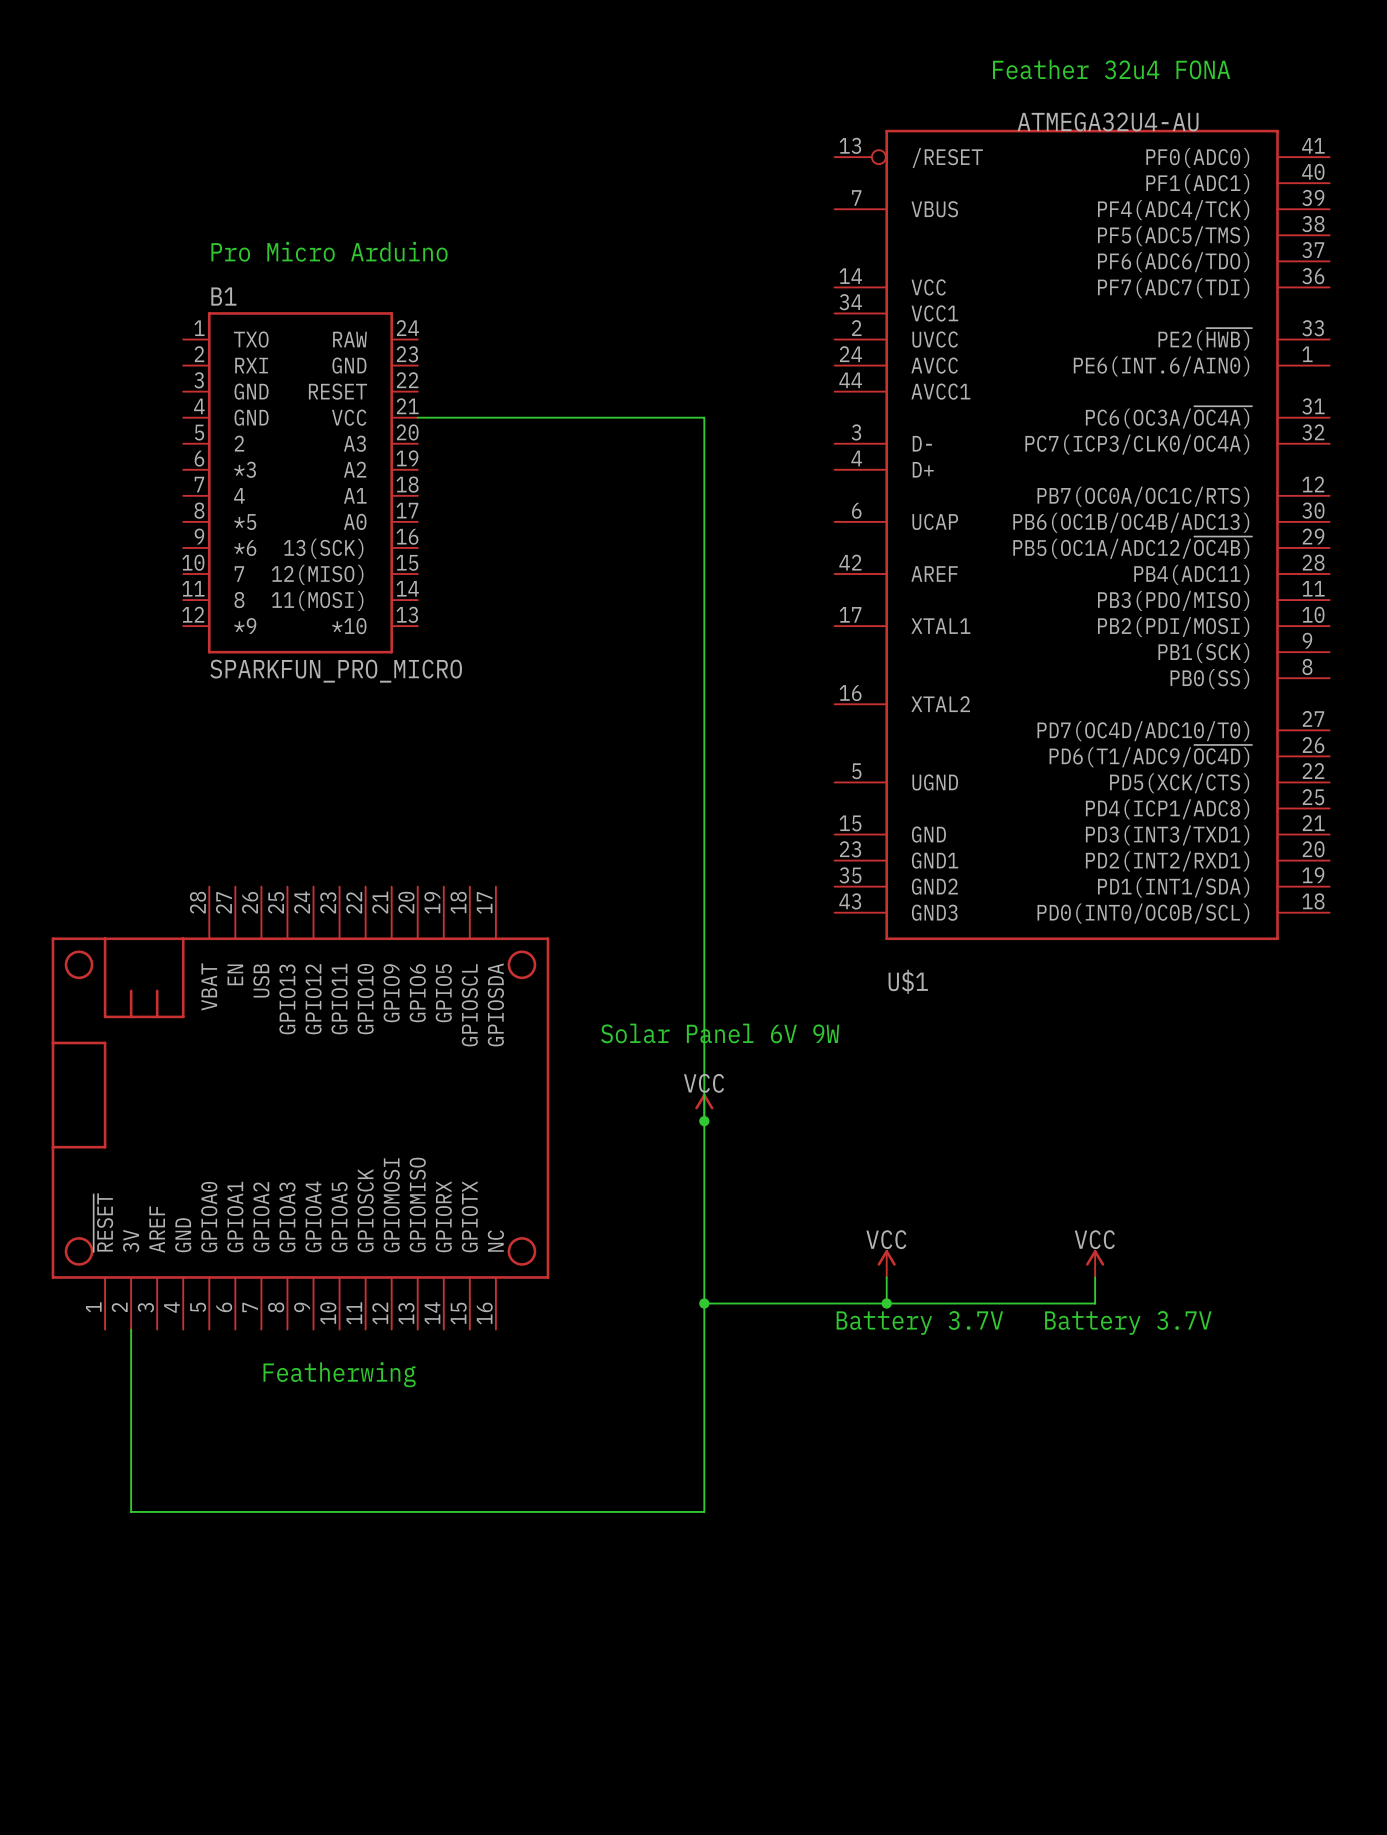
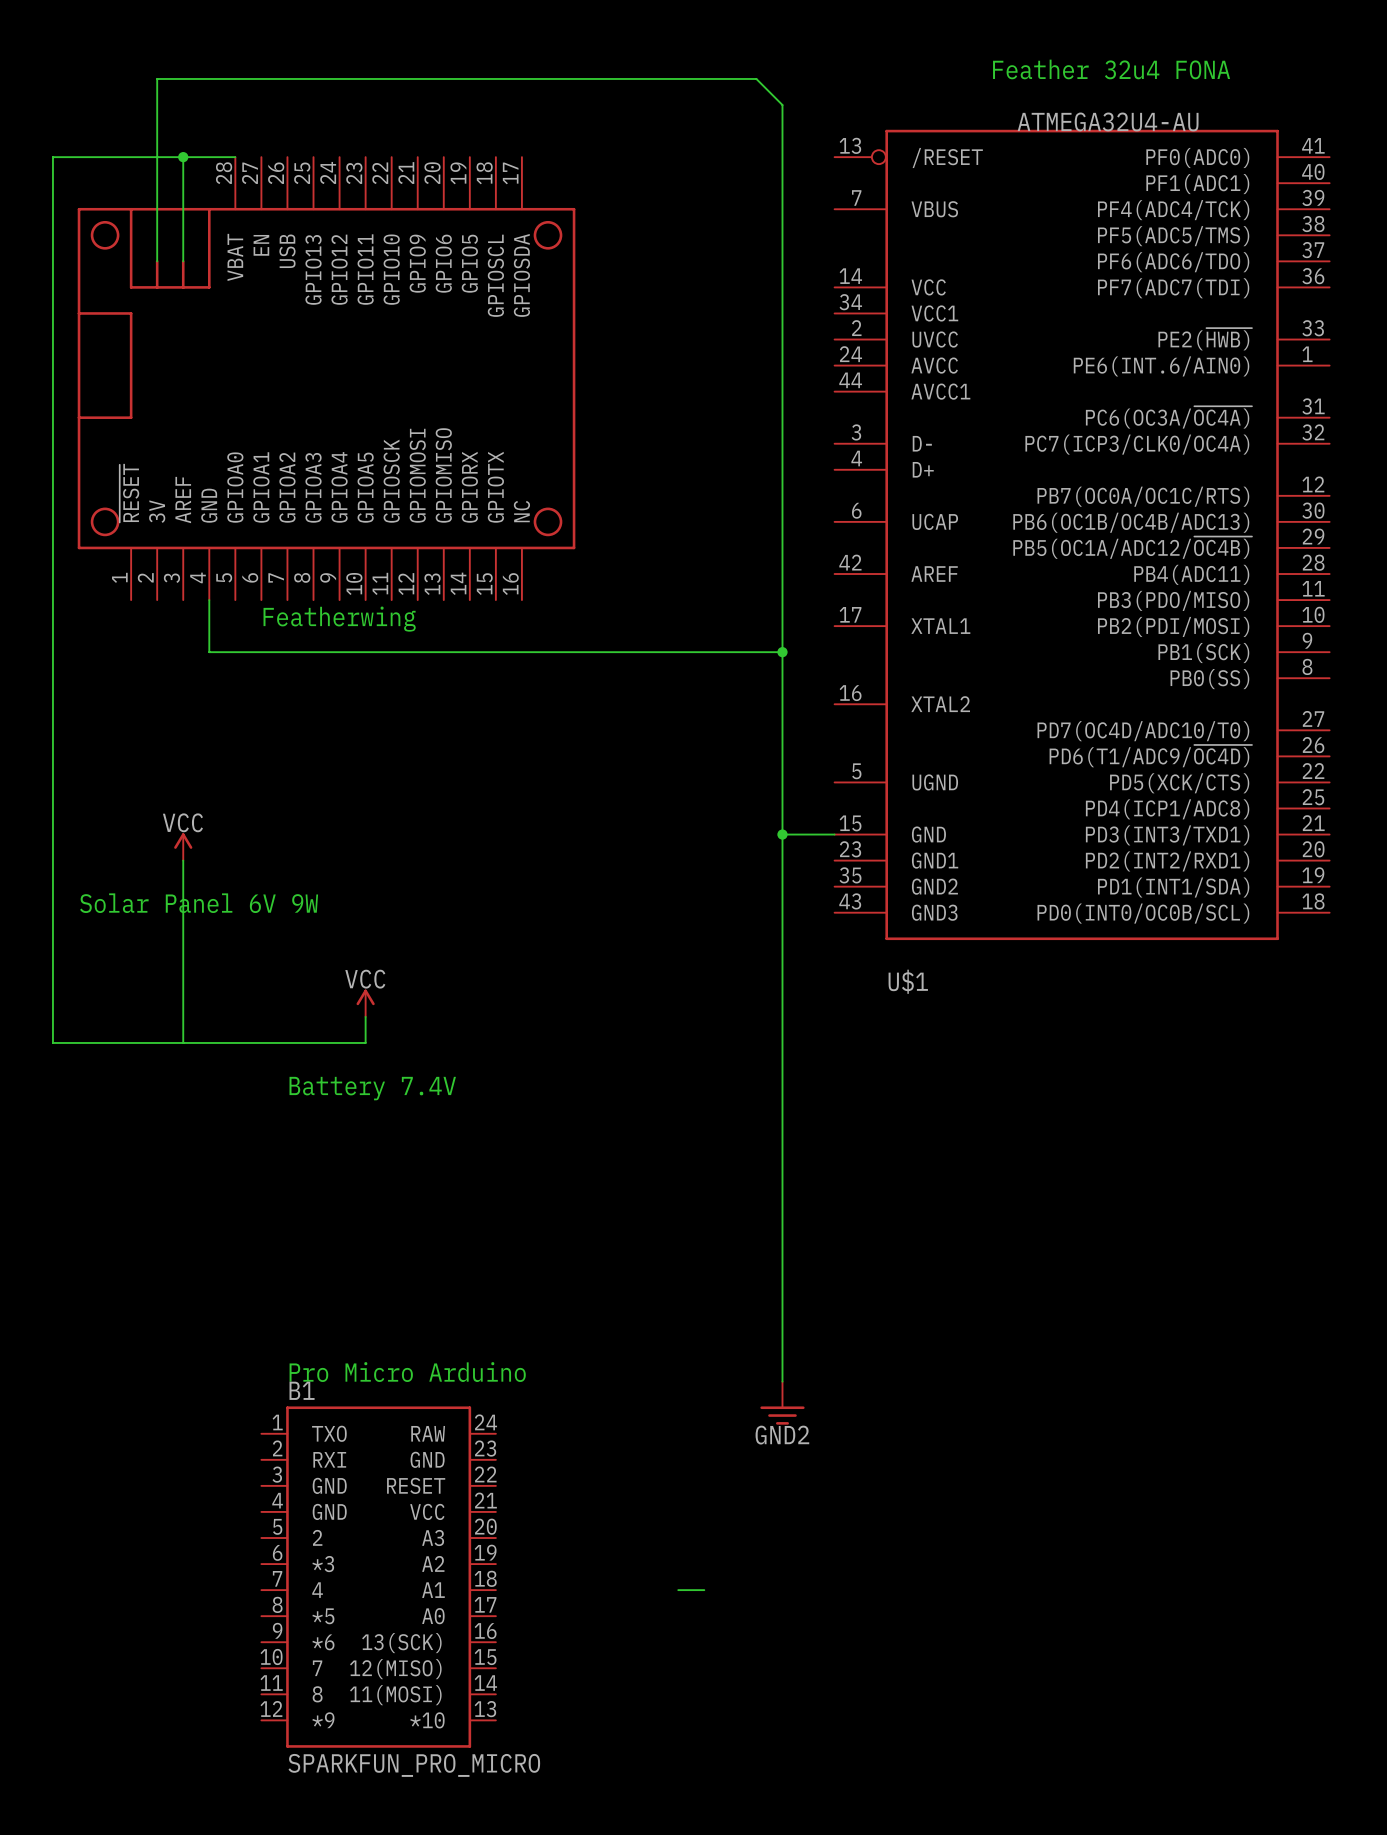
wire: none -> (183, 157) (183, 261)
junction: none -> (183, 157)
wire: none -> (235, 157) (52, 157) (52, 1042) (365, 1042) (365, 1016)
text: Pro Micro Arduino (329, 251) -> none
wire: none -> (157, 261) (157, 78) (756, 78) (782, 105) (782, 1381)
part: none -> (326, 378)
wire: (417, 417) (704, 417) (704, 1511) (131, 1511) (131, 1329) -> none
B1 position: (300, 482) -> (378, 1577)
wire: none -> (209, 600) (209, 652) (782, 652)
text: none -> Featherwing (339, 619)
junction: none -> (782, 652)
wire: none -> (782, 834) (834, 834)
junction: none -> (782, 834)
power symbol: none -> VCC (183, 846)
wire: none -> (183, 860) (183, 1042)
text: none -> Solar Panel 6V 9W (199, 903)
power symbol: none -> VCC (365, 1003)
text: Solar Panel 6V 9W (720, 1033) -> none
text: none -> Battery 7.4V (372, 1088)
power symbol: VCC (704, 1107) -> none
part: (300, 1108) -> none
junction: (704, 1121) -> none
power symbol: VCC (886, 1263) -> none
power symbol: VCC (1095, 1263) -> none
wire: (886, 1277) (886, 1303) -> none
wire: (1095, 1277) (1095, 1303) (704, 1303) -> none
junction: (704, 1303) -> none
junction: (886, 1303) -> none
text: Battery 3.7V (919, 1322) -> none
text: Battery 3.7V (1128, 1322) -> none
text: none -> Pro Micro Arduino (407, 1372)
text: Featherwing (339, 1374) -> none
power symbol: none -> GND2 (782, 1403)
wire: none -> (678, 1590) (704, 1590)

